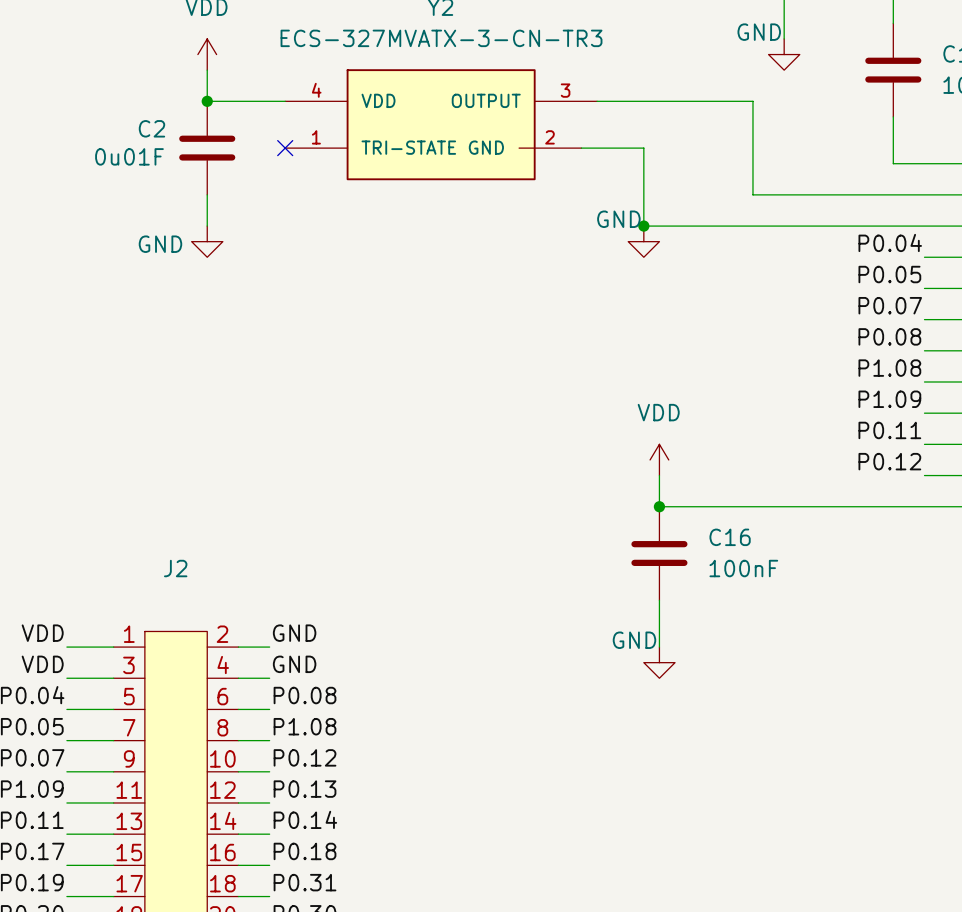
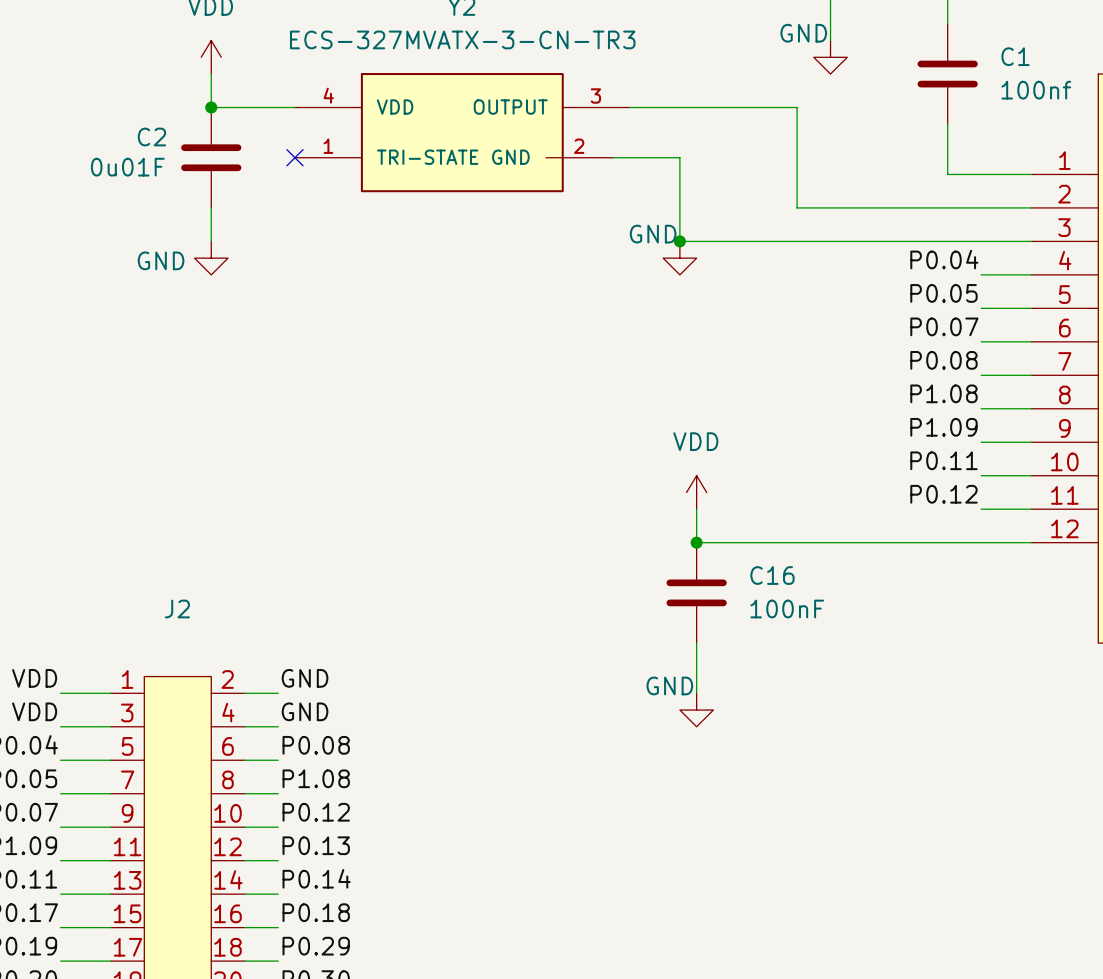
label: P0.31 (305, 882) -> P0.29 (316, 946)

